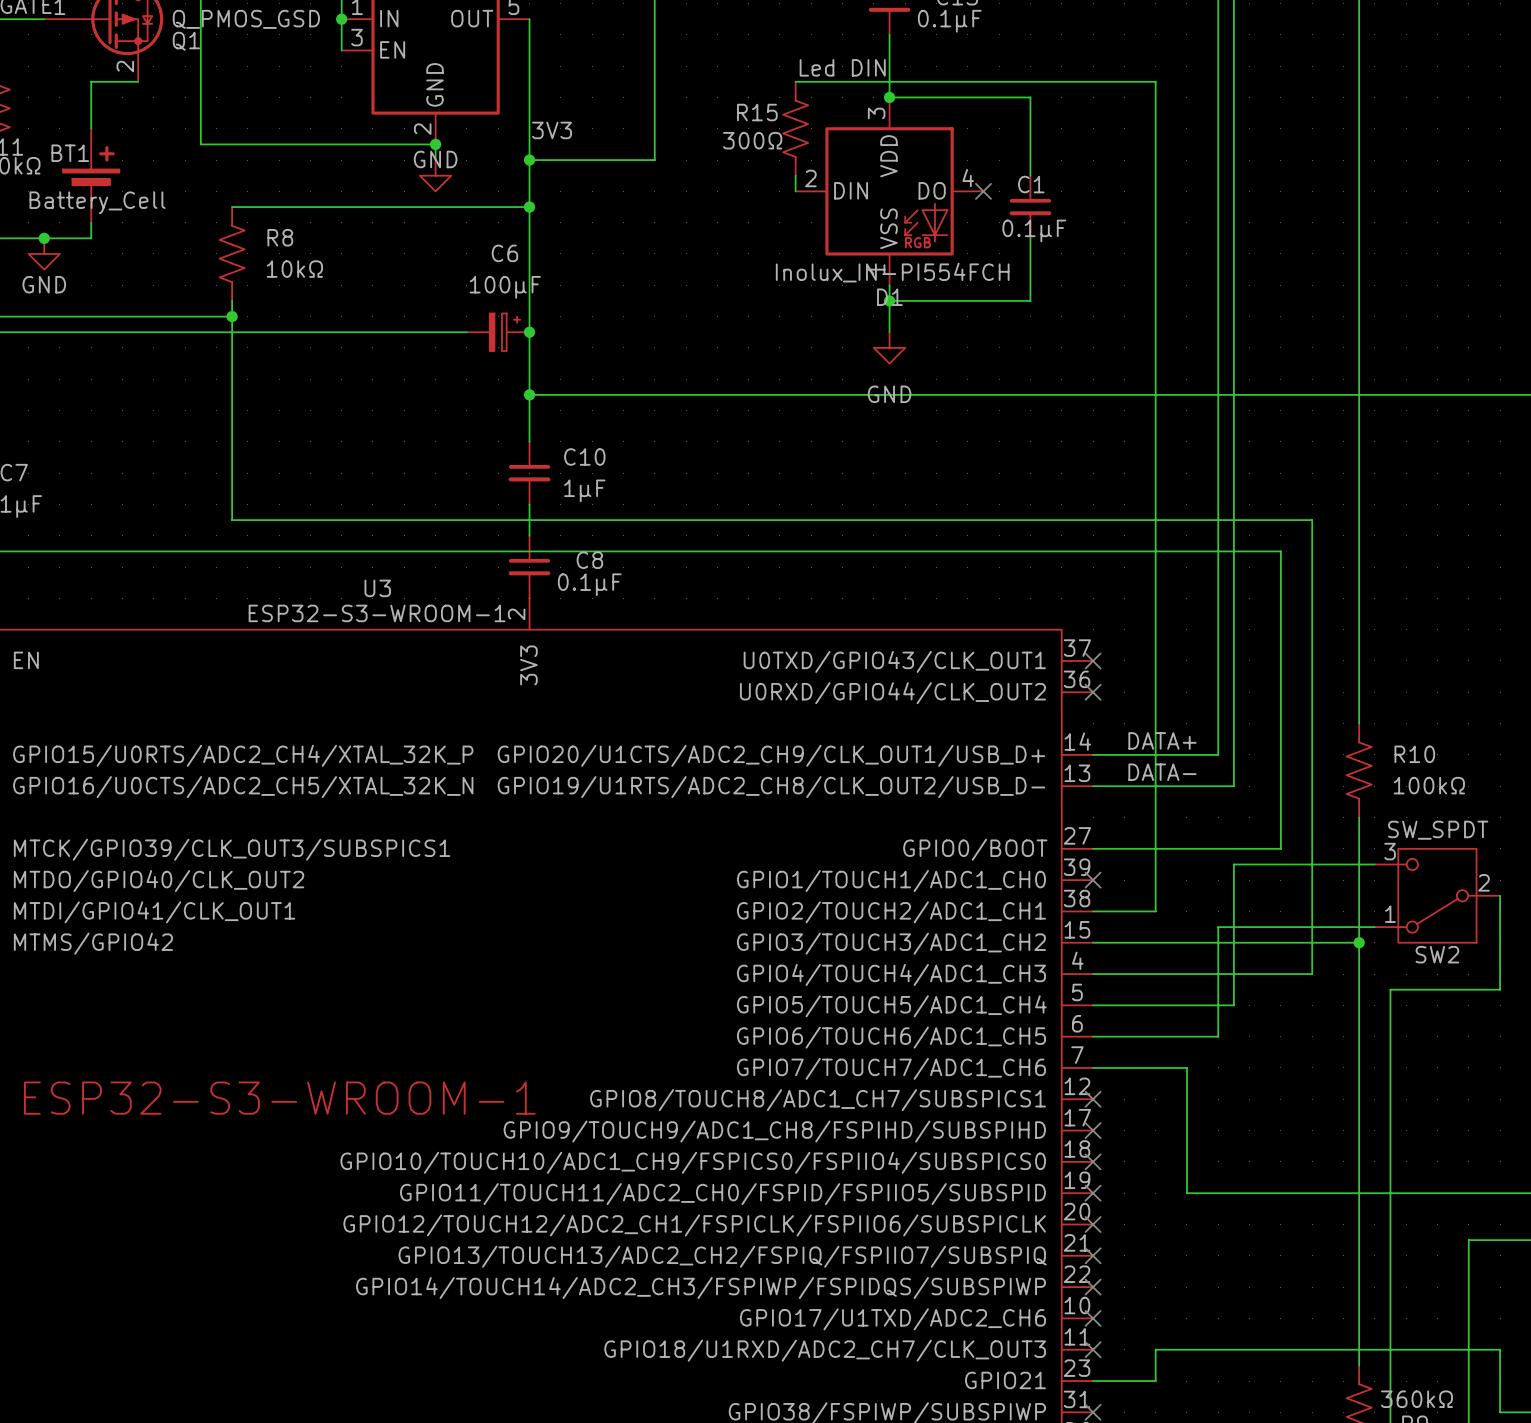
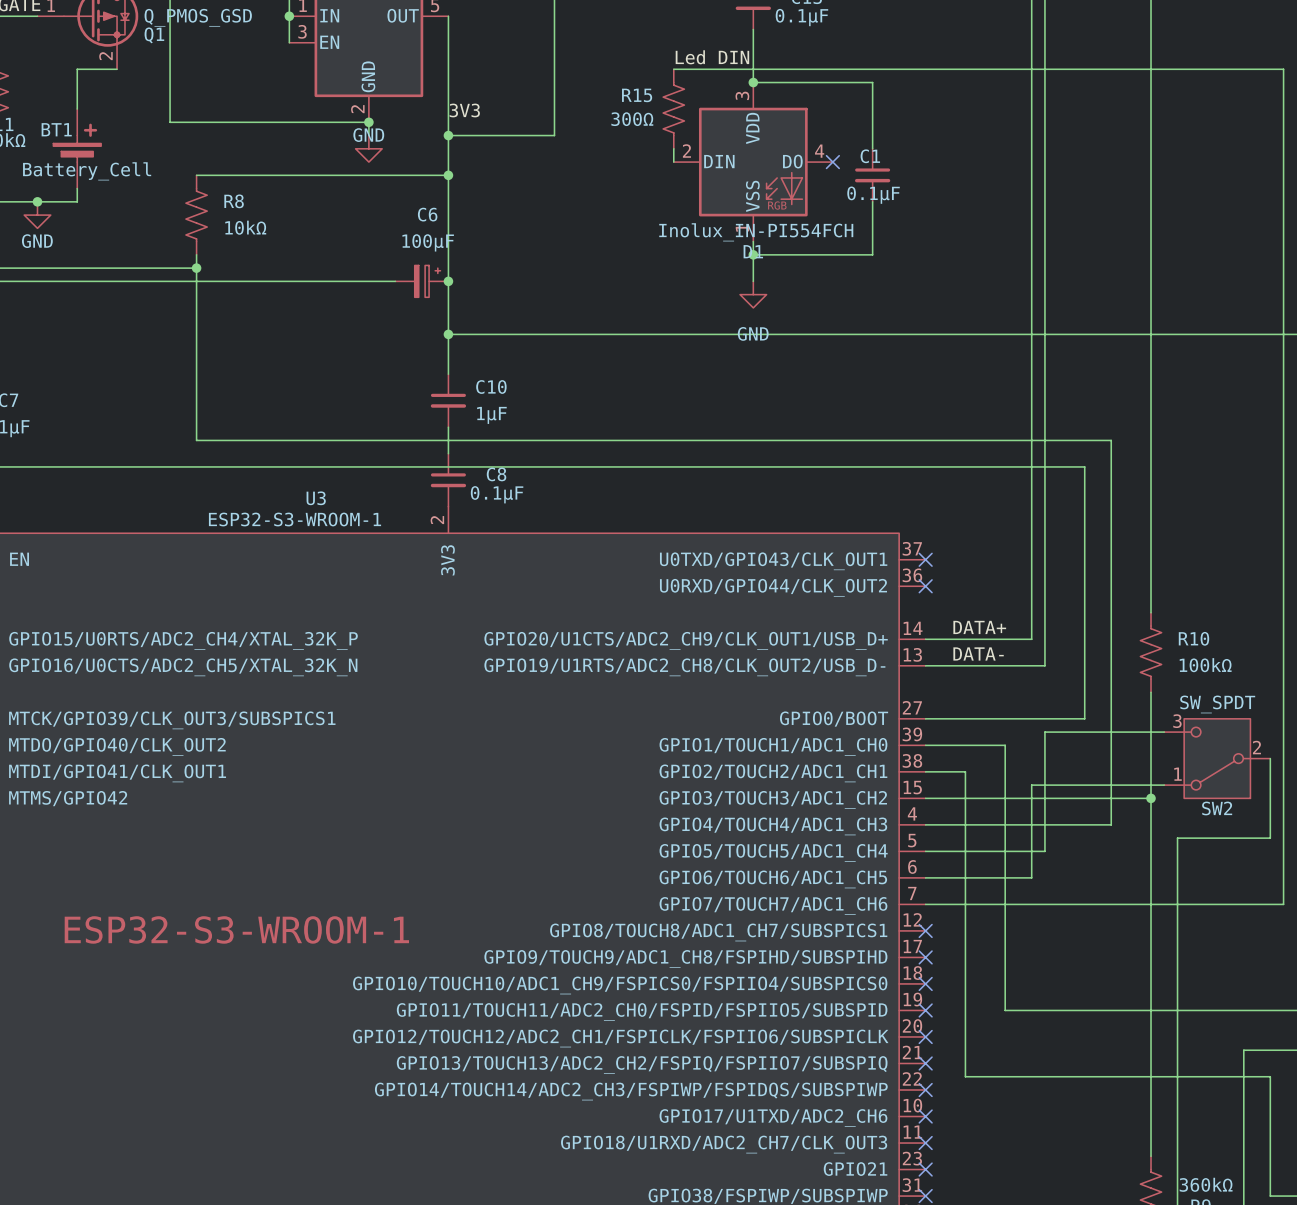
wire: (1155, 81) (1155, 911) (1140, 911) -> (978, 69) (1283, 69) (1283, 904) (1005, 904) (1005, 745) (925, 745)
no-connect mark: (1093, 880) -> none
wire: (1500, 1349) (1155, 1349) (1155, 1381) (1093, 1381) -> (1270, 1143) (1270, 1076) (965, 1076) (965, 771)
no-connect mark: none -> (925, 1169)

